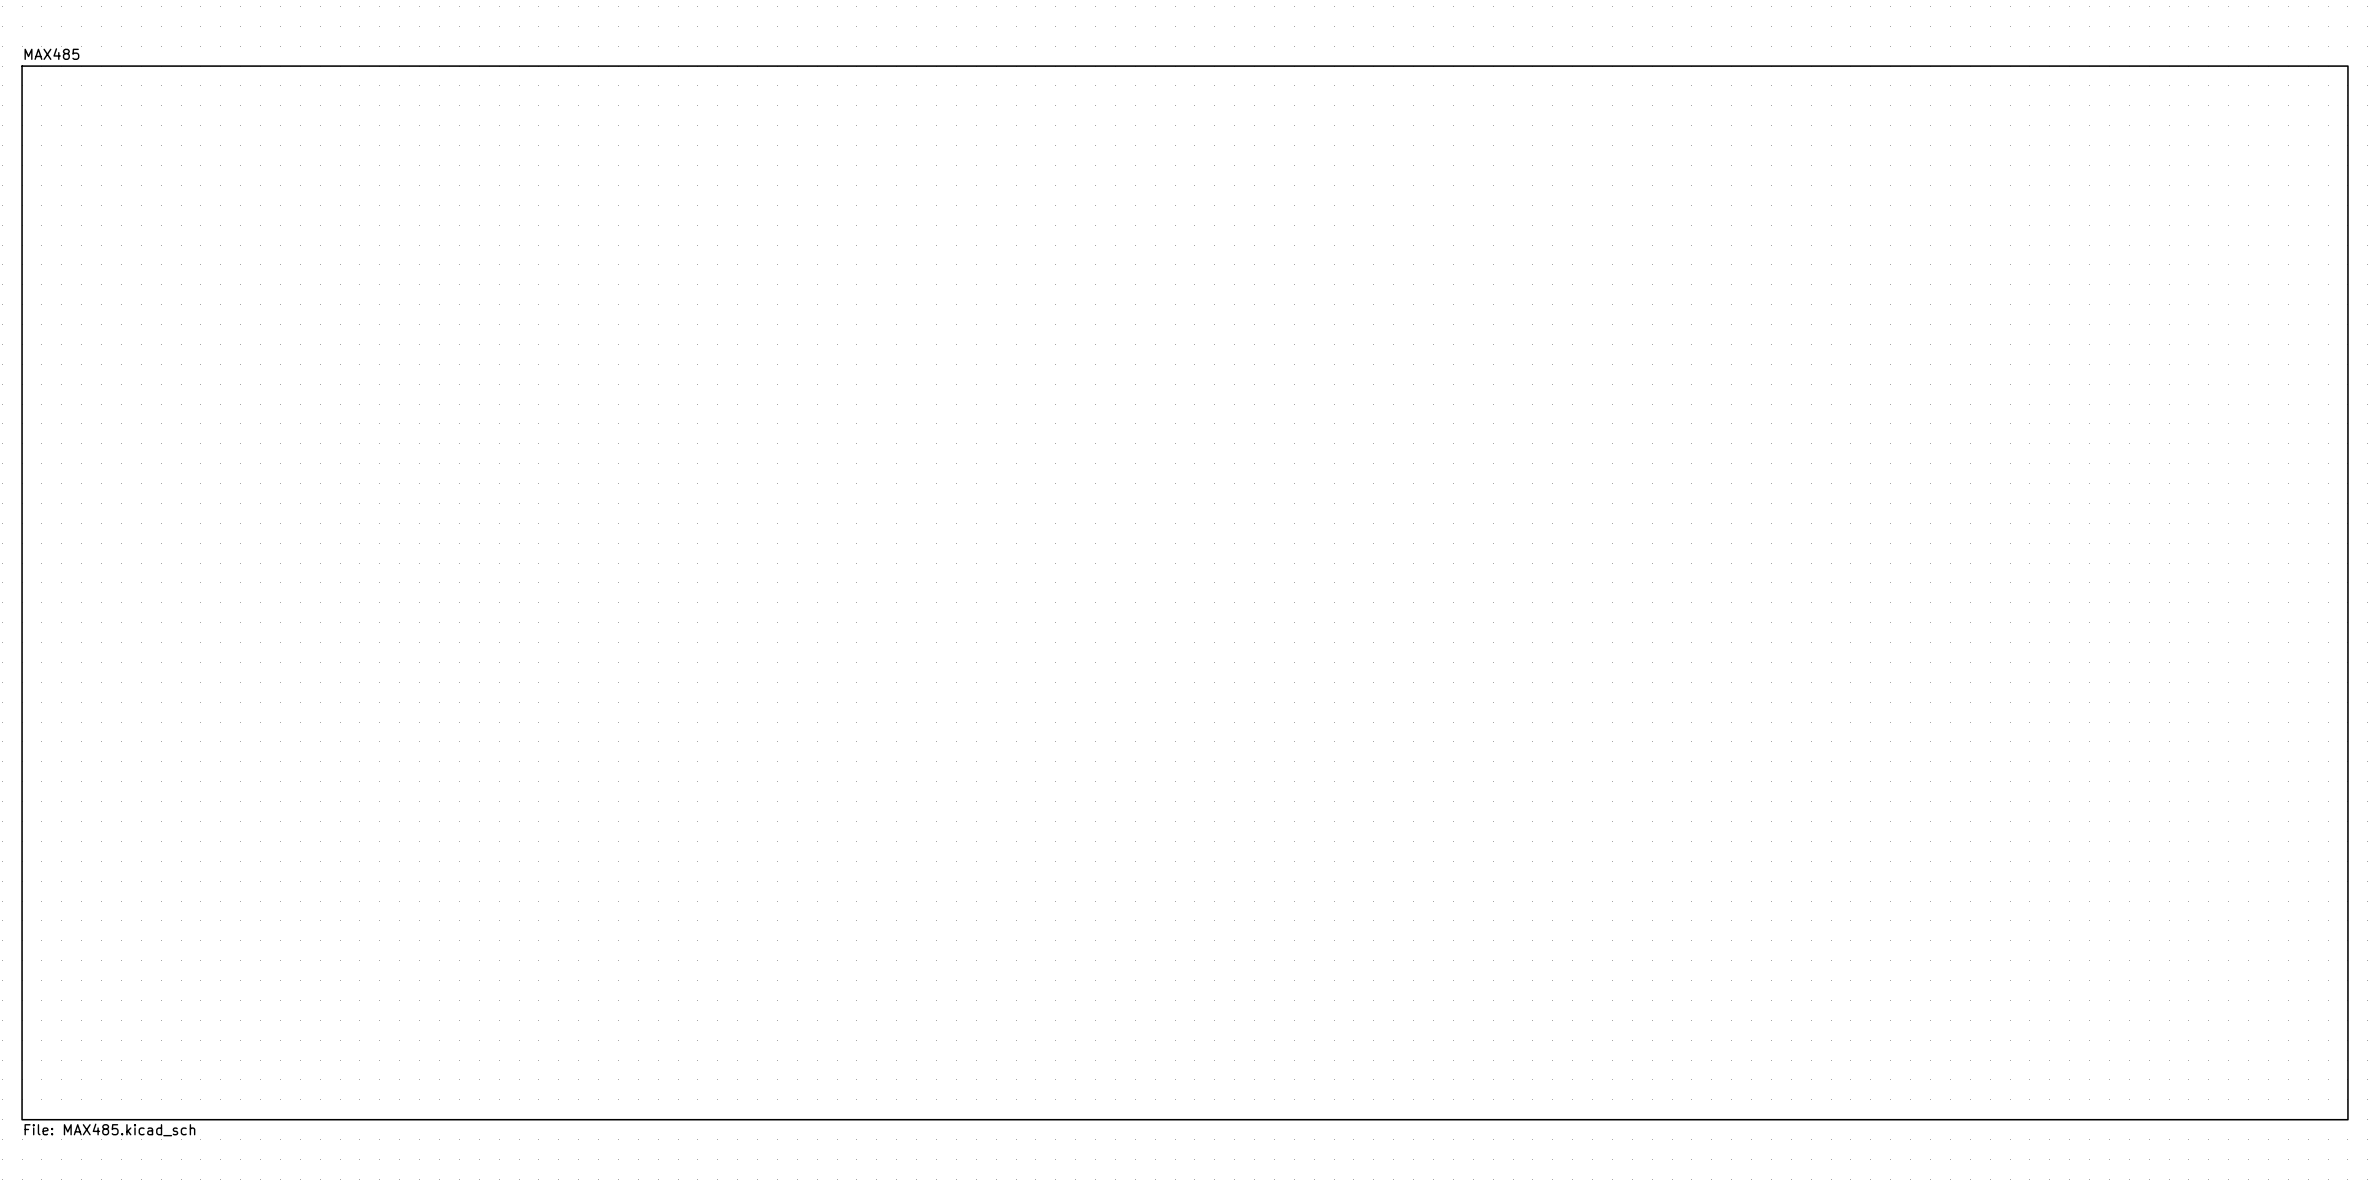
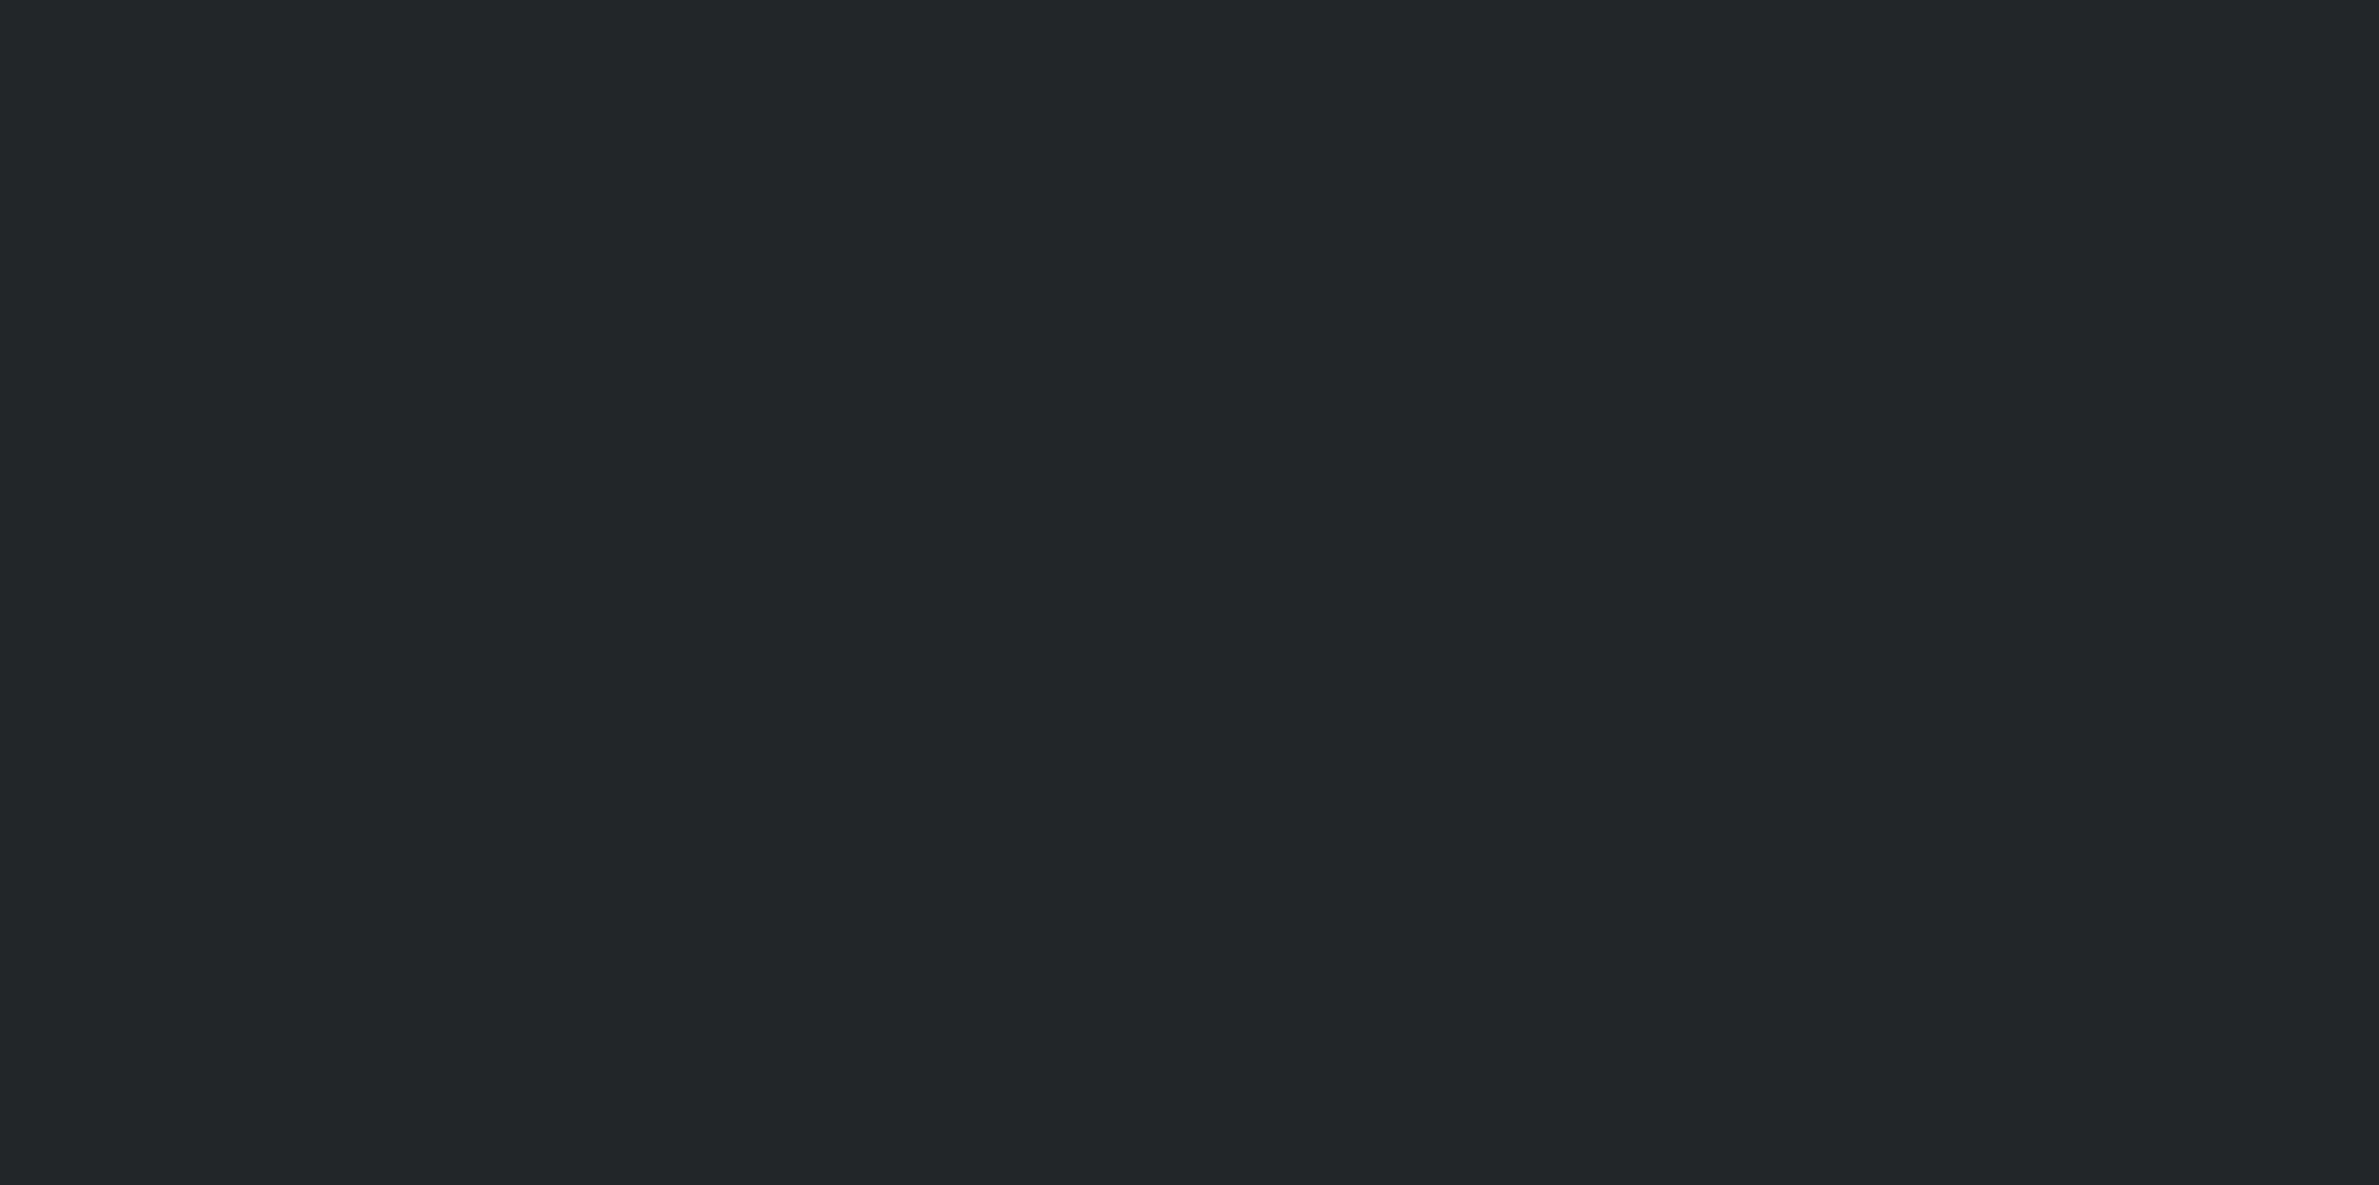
sheet MAX485: File: MAX485.kicad_sch (1185, 592) -> none

